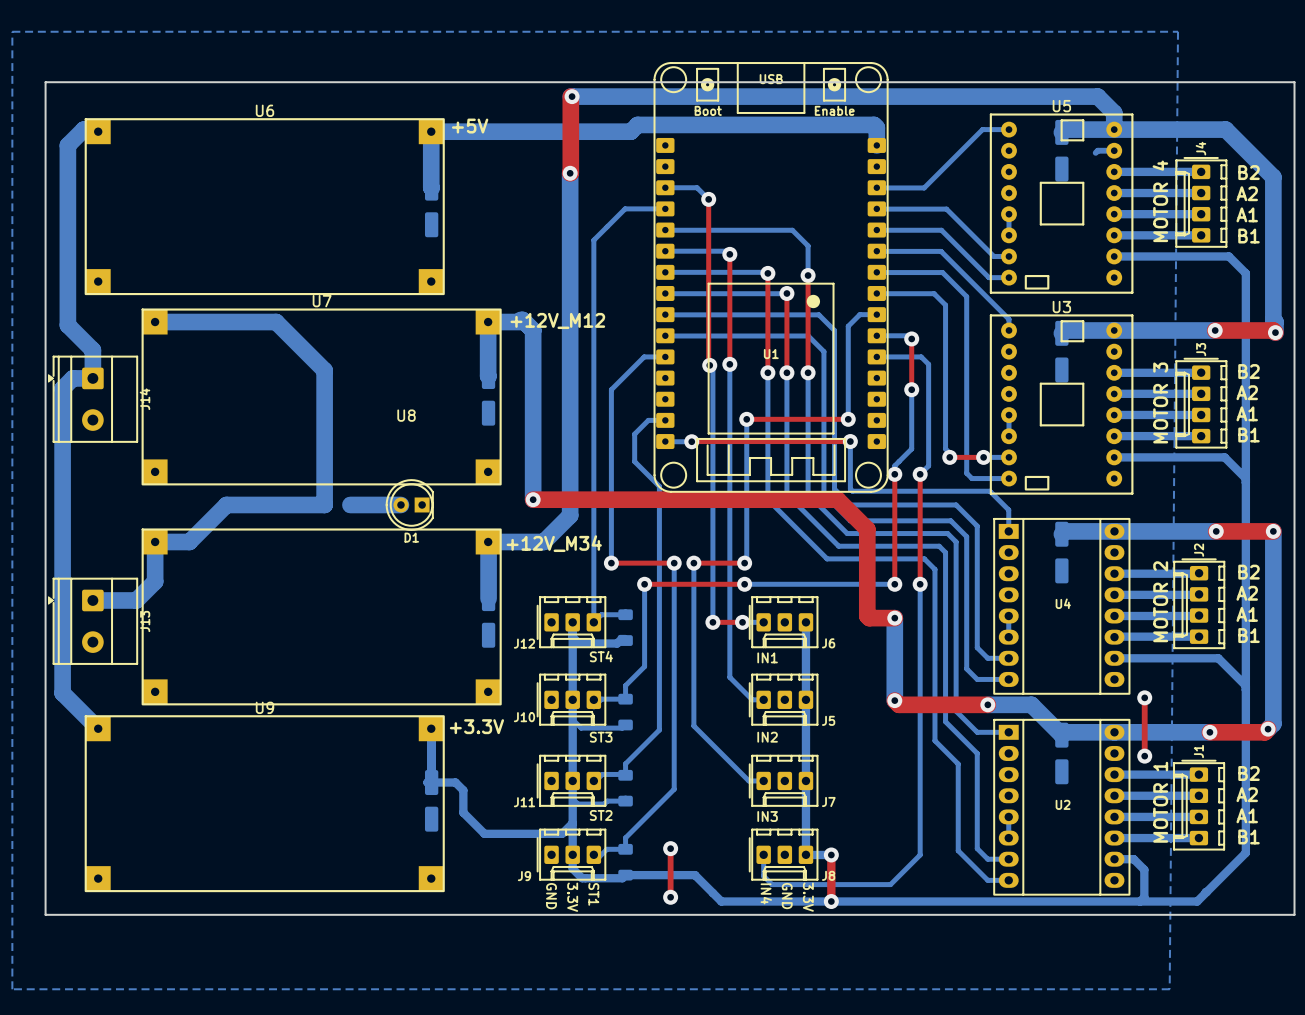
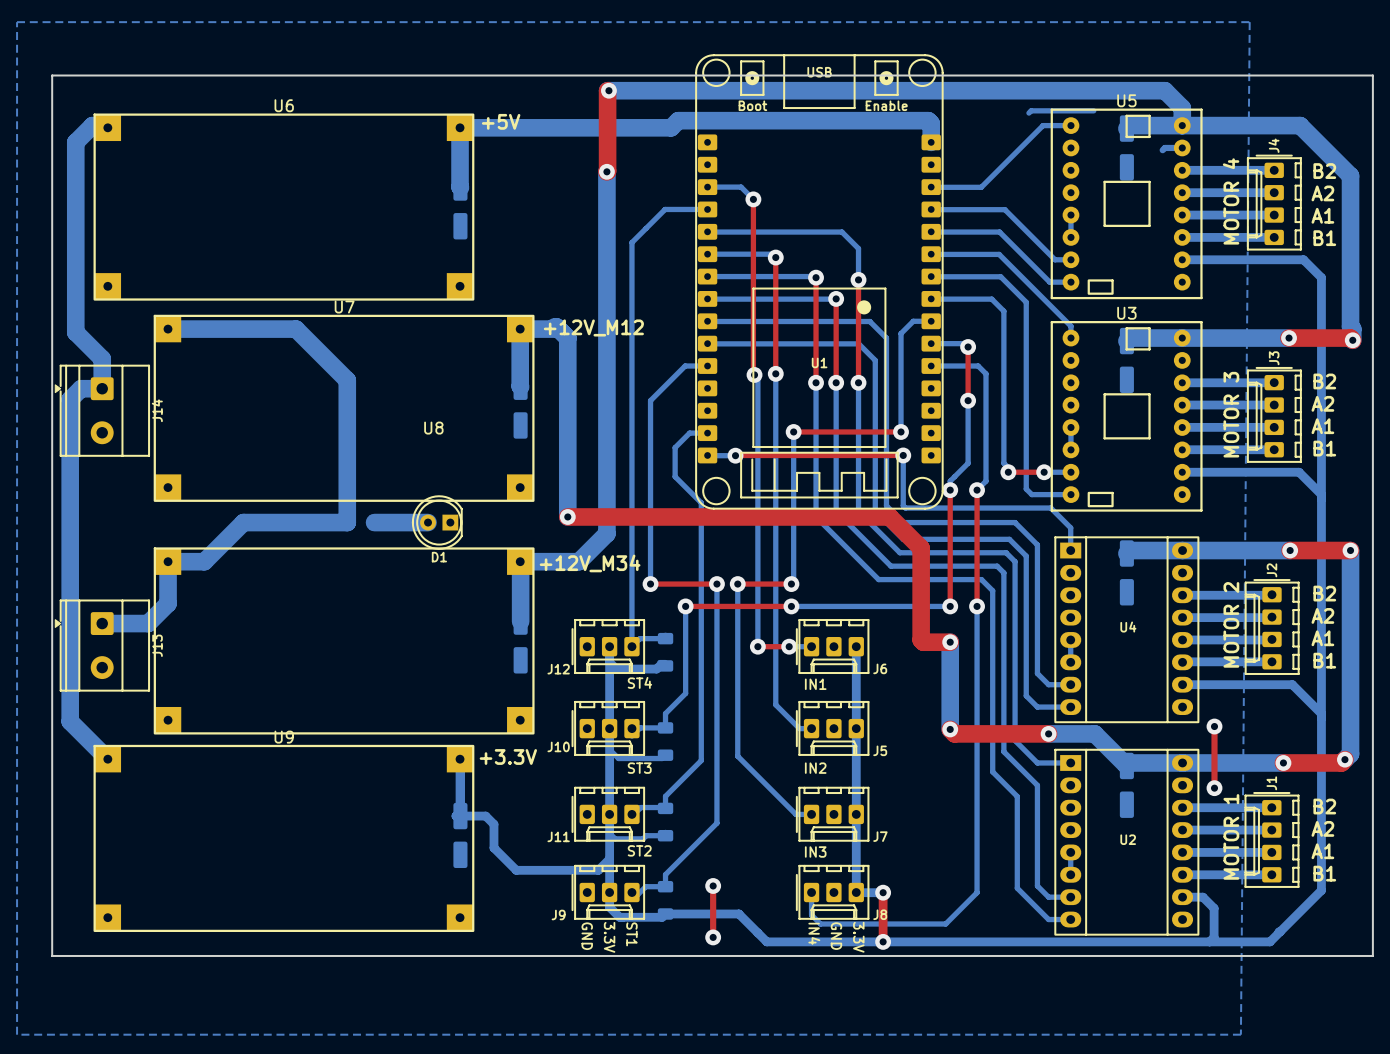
bottom track: none -> (1093, 110) (1031, 110) (1028, 113)

